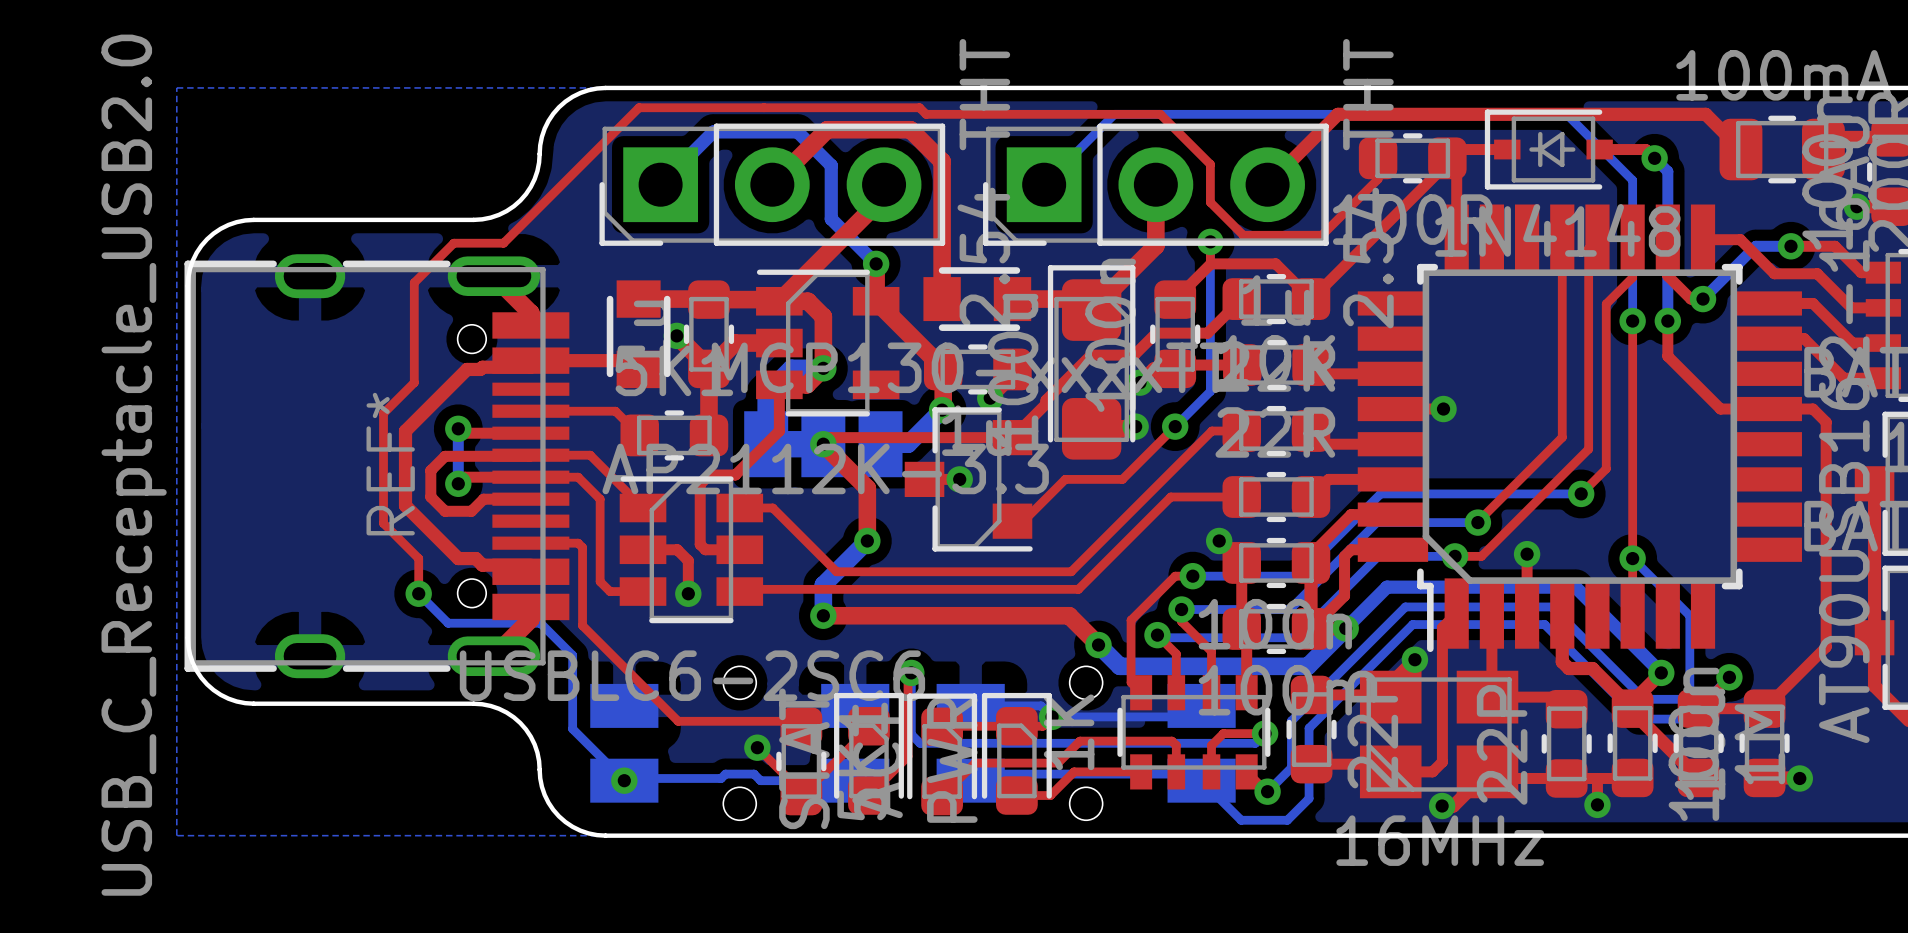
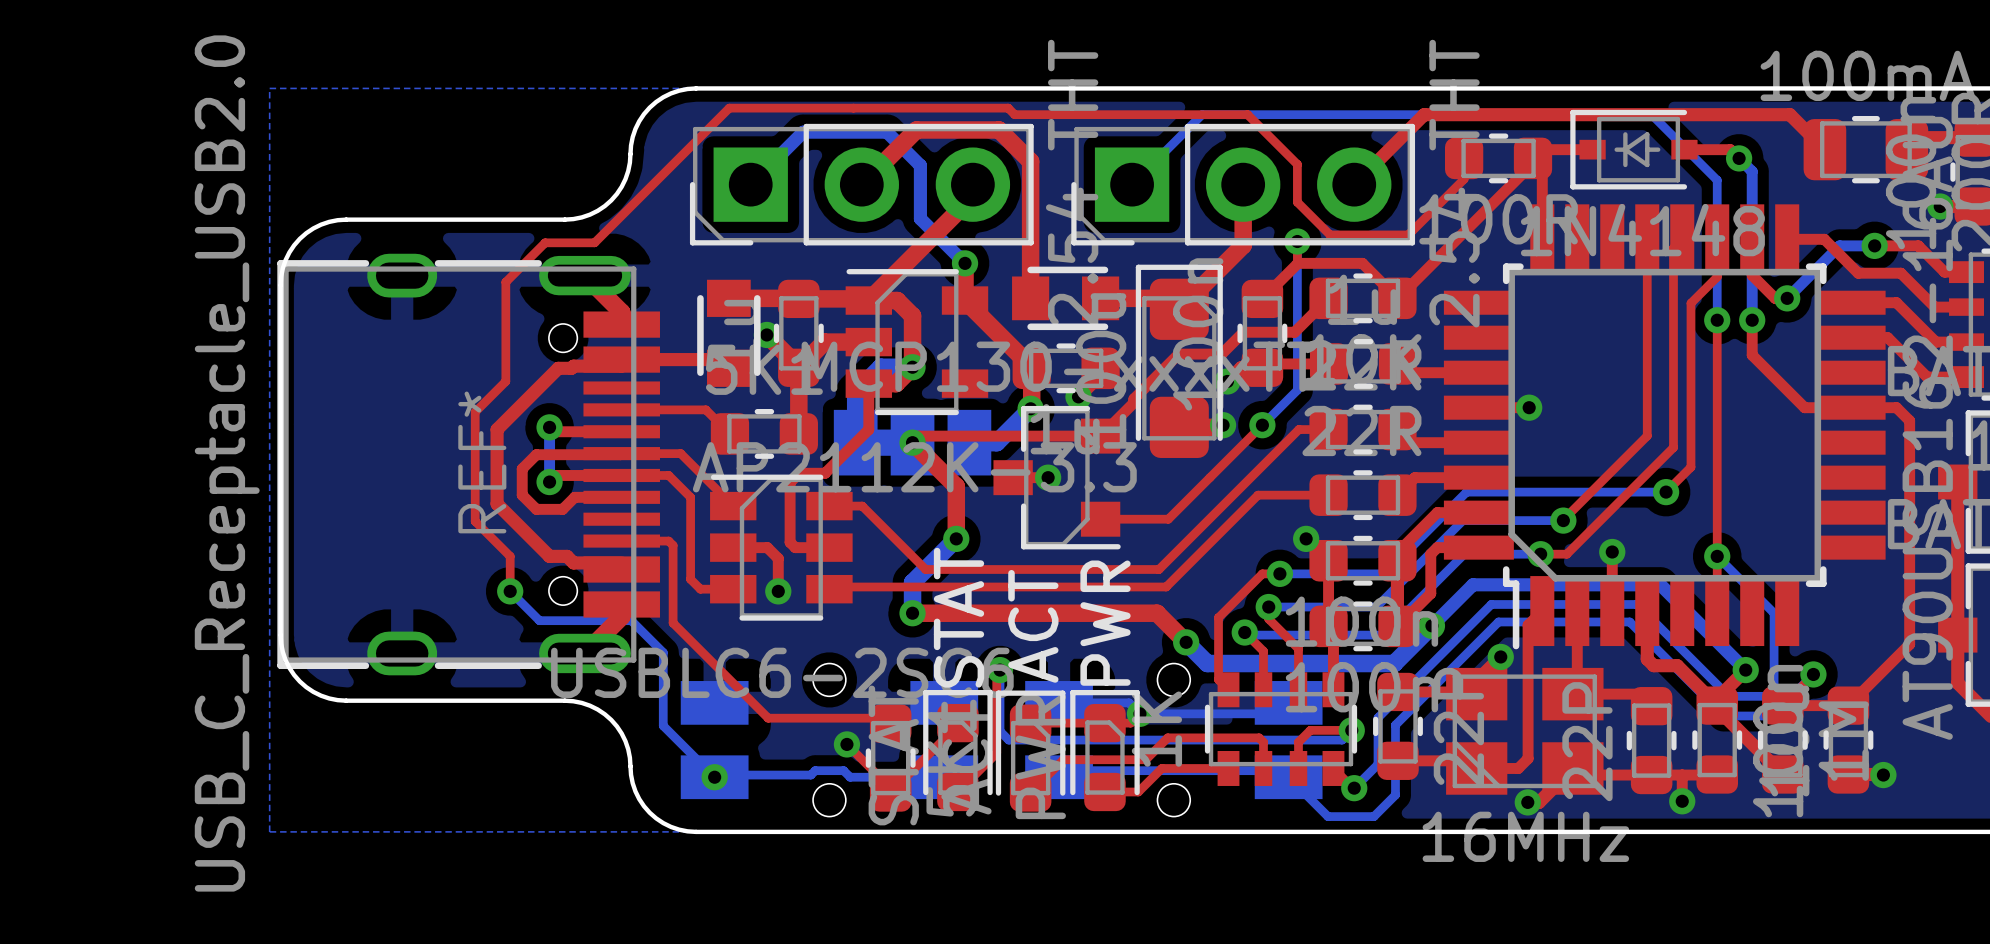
top track: (1122, 479) (1065, 479) (1023, 521) -> (1209, 477) (1168, 519) (1111, 519)
text: none -> STAT (959, 617)
text: none -> PWR (1105, 623)
text: none -> ACT (1033, 626)

